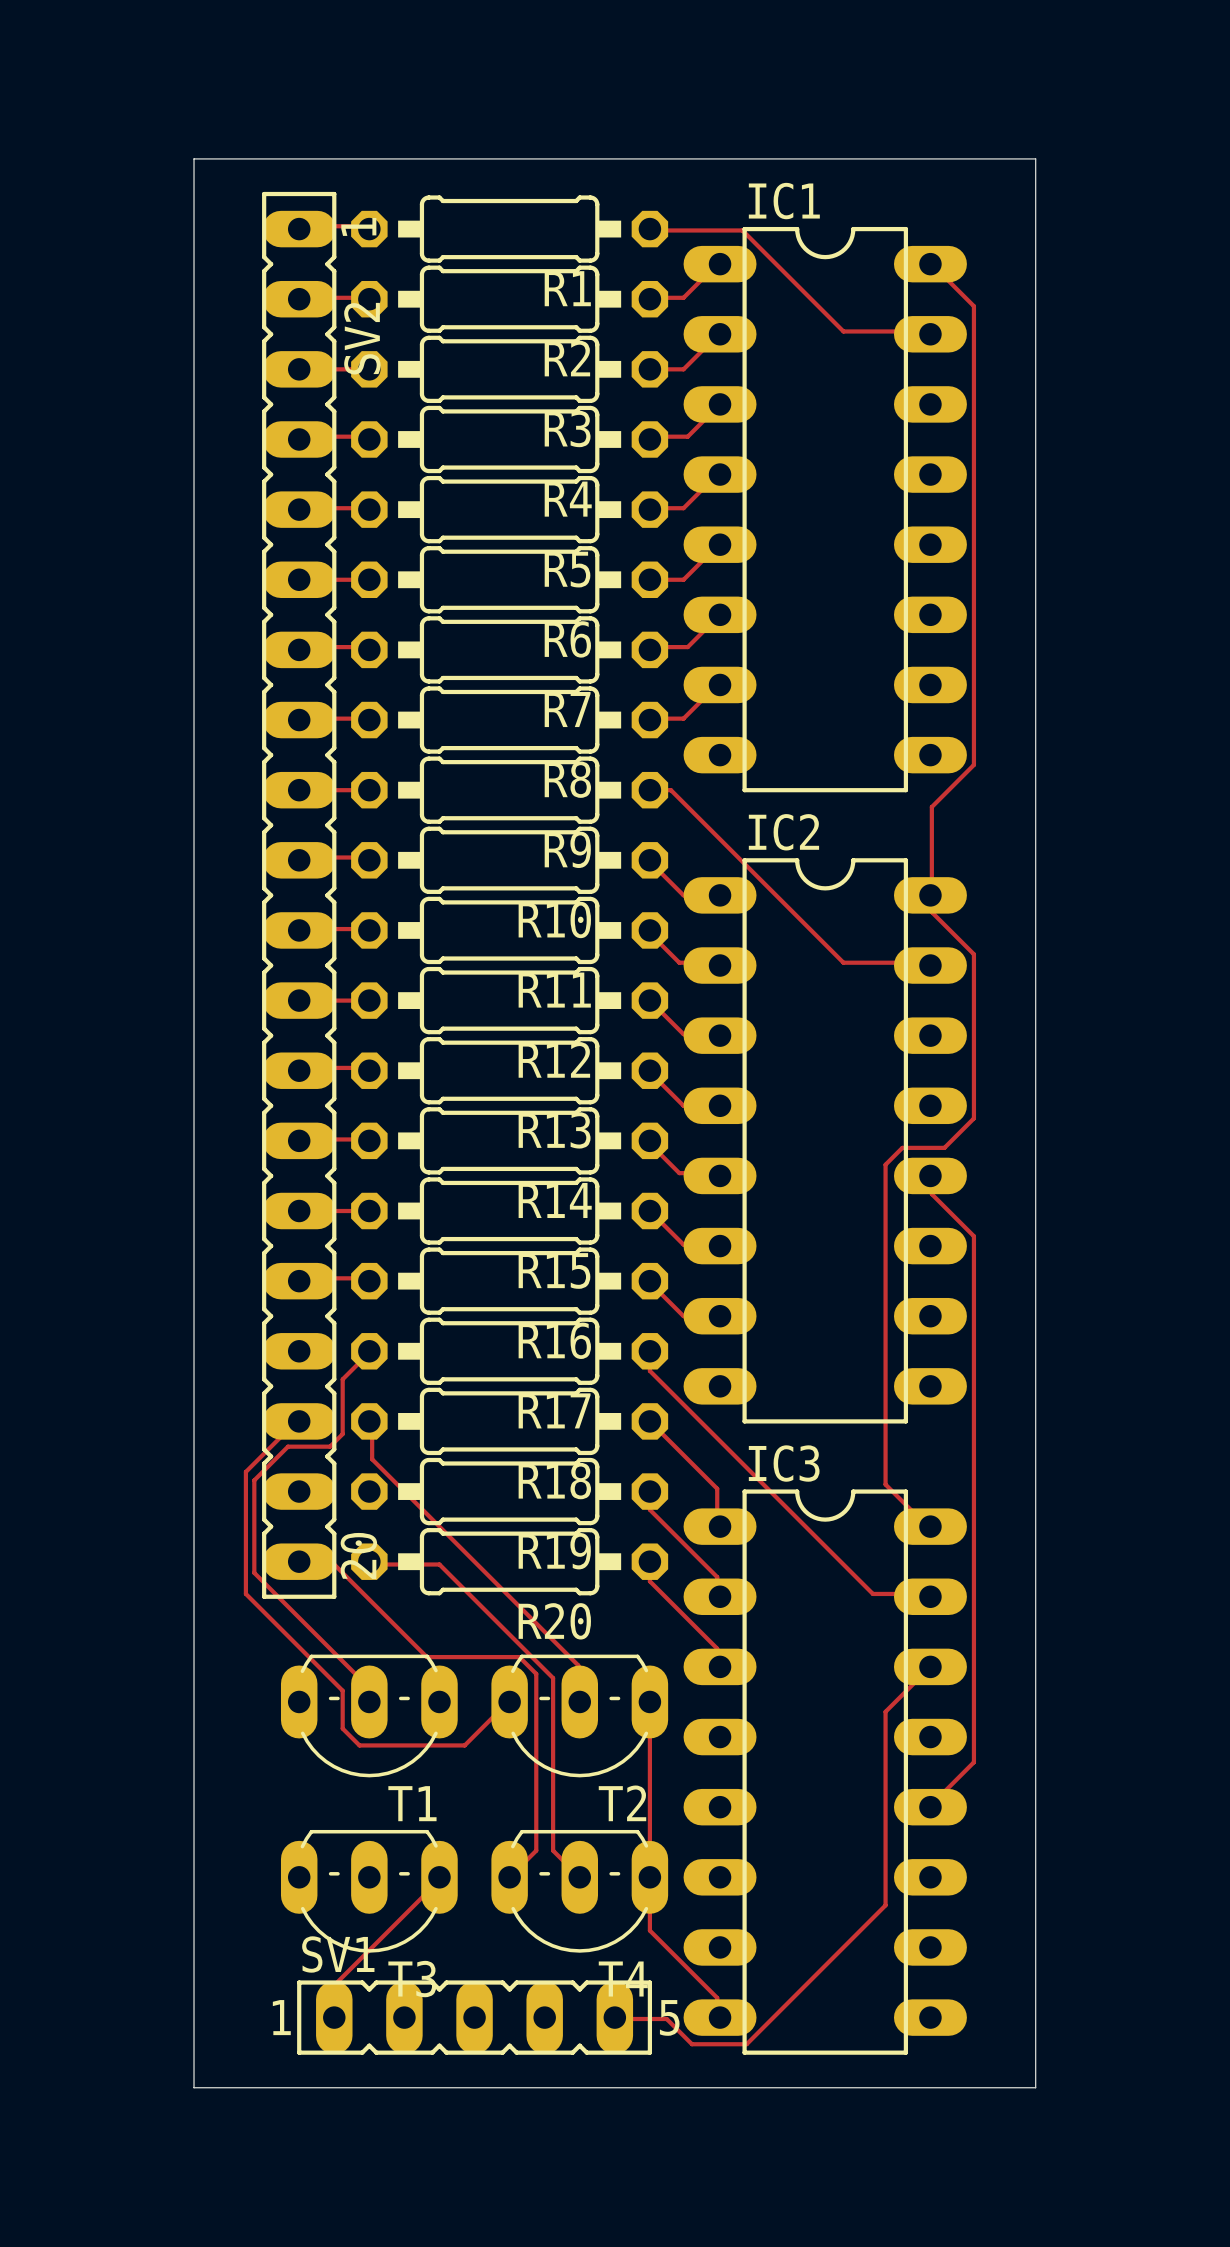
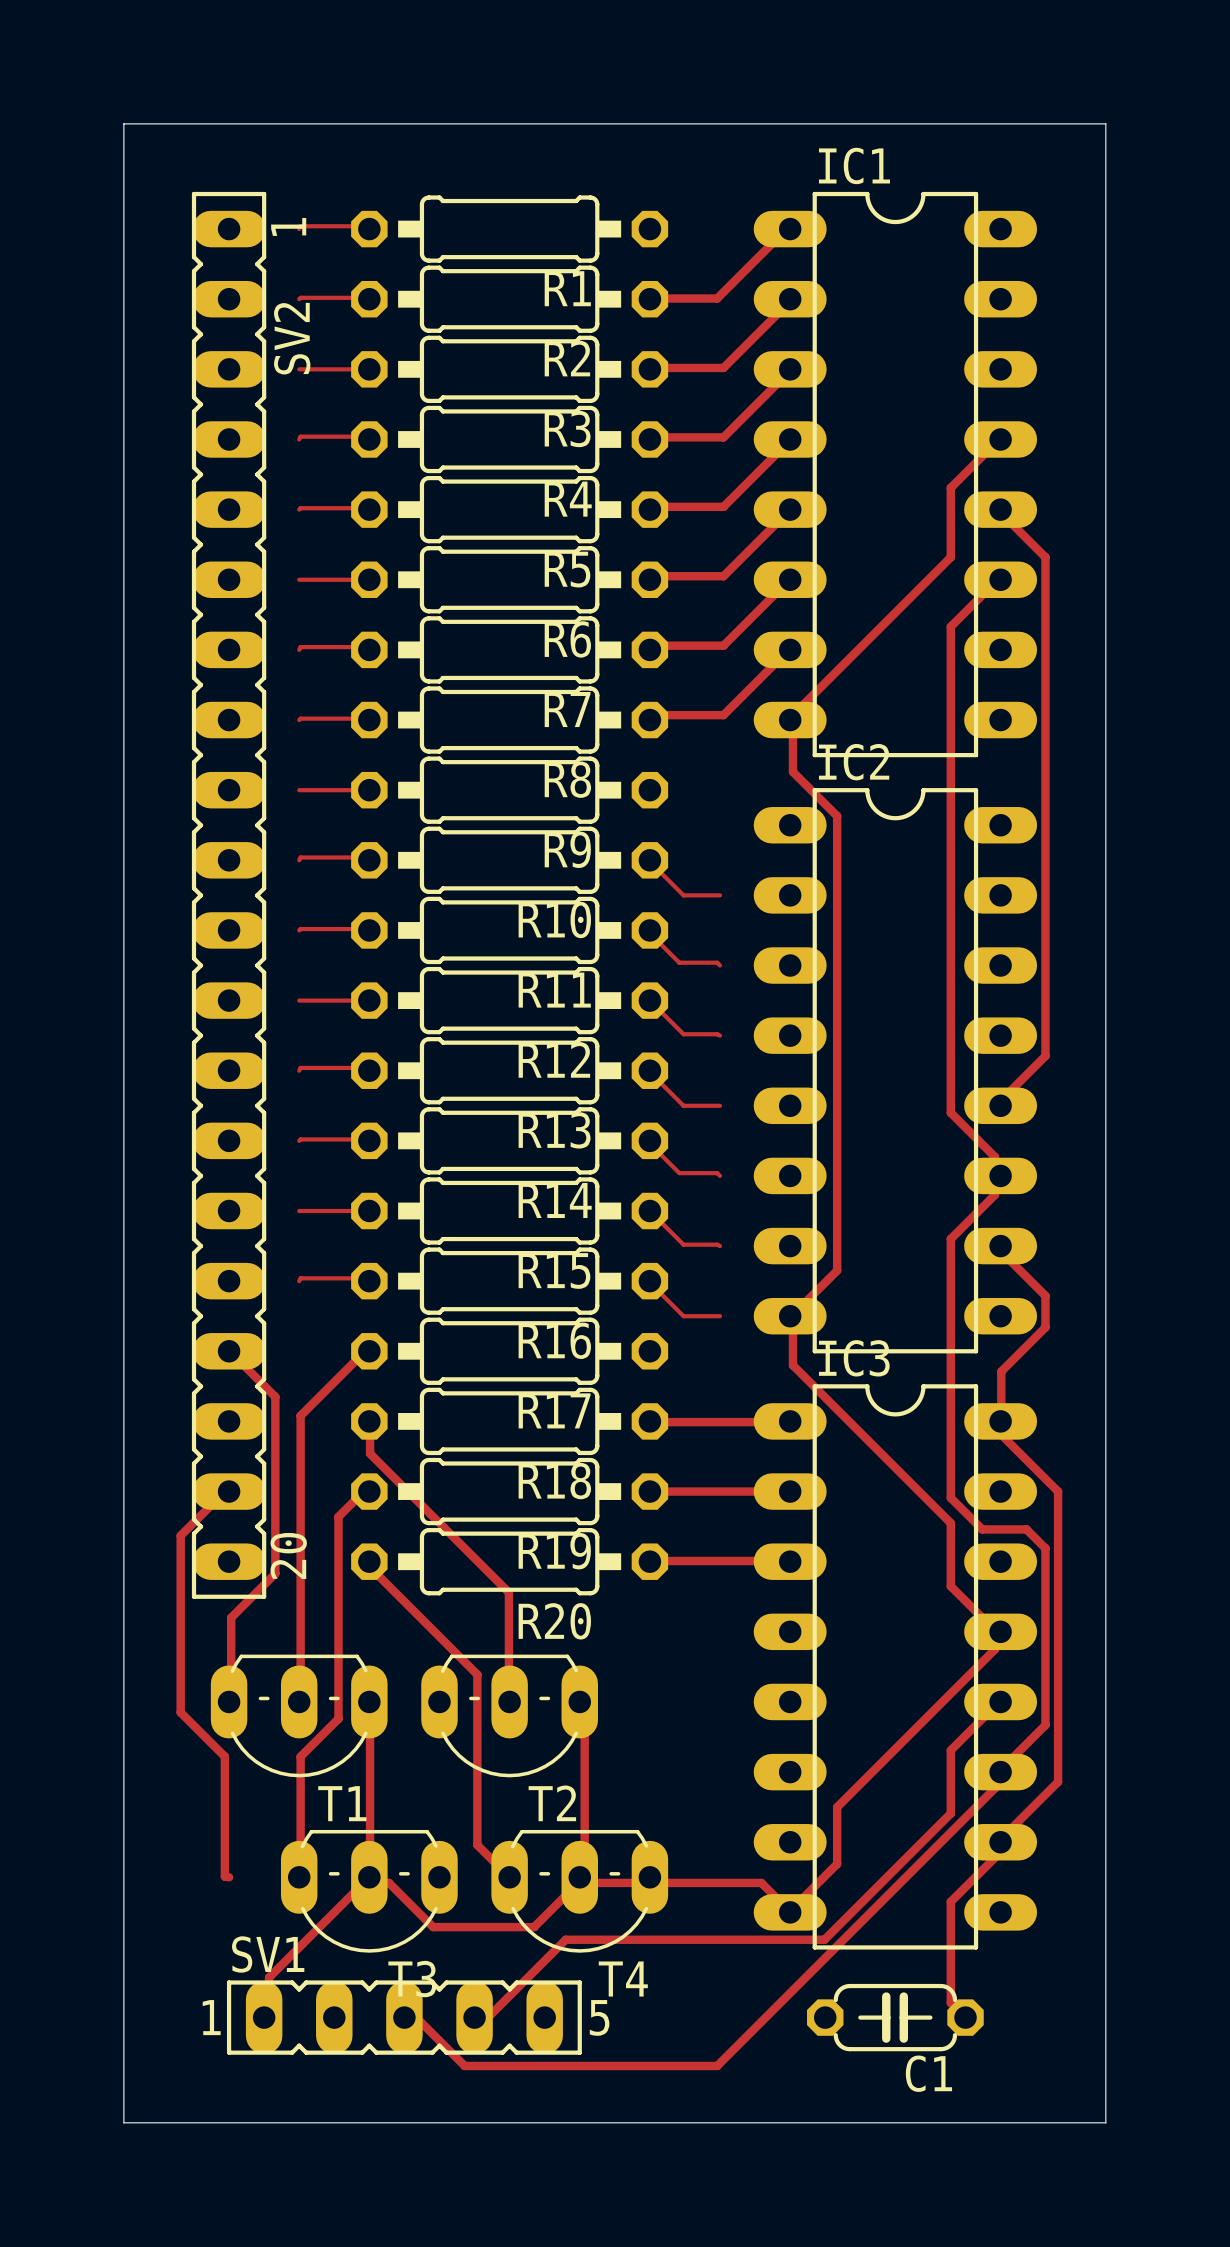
board edge: (194, 158) (1035, 158) (1035, 2087) (194, 2087) (194, 158) -> (123, 123) (123, 2122) (1105, 2122) (1105, 123) (123, 123)
track: (649, 229) (742, 230) (843, 331) (927, 331) (930, 334) -> none
track: (720, 264) (717, 264) (683, 297) (649, 299) -> (790, 229) (786, 229) (717, 298) (649, 299)
track: (930, 264) (973, 306) (973, 764) (931, 807) (931, 912) (973, 954) (973, 1118) (944, 1147) (902, 1147) (885, 1164) (885, 1484) (927, 1526) (930, 1526) -> none
track: (720, 334) (683, 369) (649, 369) -> (790, 299) (723, 367) (649, 369)
track: (720, 404) (687, 436) (649, 436) (649, 439) -> (790, 369) (723, 437) (654, 437) (649, 439)
track: none -> (1000, 439) (950, 487) (950, 557) (790, 720) (792, 721) (792, 771) (837, 816) (837, 1270) (790, 1316) (792, 1321) (792, 1365) (950, 1523) (950, 1586) (994, 1630) (1000, 1631) (994, 1636) (994, 1649) (837, 1807) (837, 1863) (790, 1912) (761, 1882) (584, 1882) (579, 1877)
track: (720, 474) (717, 474) (683, 508) (649, 509) -> (790, 439) (723, 506) (654, 506) (649, 509)
IC1 position: (825, 509) -> (895, 474)
track: none -> (1000, 509) (1001, 513) (1045, 557) (1045, 1056) (1001, 1100) (1000, 1105)
track: (720, 544) (683, 579) (649, 579) -> (790, 509) (723, 576) (654, 576) (649, 579)
track: none -> (1000, 579) (994, 582) (950, 626) (950, 1112) (994, 1157) (994, 1194) (950, 1239) (950, 1497) (982, 1529) (1026, 1529) (1045, 1548) (1045, 1725) (994, 1775) (994, 1788) (717, 2065) (464, 2065) (420, 2021) (407, 2021) (404, 2017)
track: (720, 614) (687, 647) (649, 647) (649, 649) -> (790, 579) (723, 645) (654, 645) (649, 649)
track: (720, 684) (717, 684) (683, 718) (649, 720) -> (790, 649) (723, 715) (654, 715) (649, 720)
track: (649, 790) (670, 790) (843, 962) (927, 962) (930, 965) -> none
SV2 position: (299, 895) -> (229, 895)
IC2 position: (825, 1140) -> (895, 1070)
track: (930, 1175) (931, 1194) (973, 1236) (973, 1762) (930, 1807) -> none
track: none -> (1000, 1246) (1001, 1251) (1045, 1295) (1045, 1327) (1001, 1371) (1000, 1421) (1001, 1434) (1058, 1491) (1058, 1781) (1001, 1838) (1000, 1842) (994, 1845) (994, 1857) (950, 1901) (950, 2002) (965, 2017)
track: none -> (229, 1351) (275, 1396) (275, 1573) (231, 1617) (231, 1699) (229, 1701)
track: (369, 1351) (342, 1379) (342, 1434) (330, 1446) (287, 1446) (254, 1480) (254, 1572) (367, 1686) (369, 1701) -> (369, 1351) (363, 1352) (300, 1415) (299, 1701)
track: (649, 1351) (649, 1370) (872, 1593) (927, 1593) (930, 1596) -> none
track: (299, 1421) (296, 1421) (245, 1471) (245, 1593) (342, 1690) (342, 1728) (359, 1745) (464, 1745) (509, 1701) -> none
track: (369, 1421) (372, 1421) (372, 1459) (578, 1665) (579, 1701) -> (369, 1421) (370, 1453) (508, 1592) (509, 1701)
track: (649, 1421) (717, 1488) (717, 1526) (720, 1526) -> (649, 1421) (790, 1421)
track: none -> (229, 1491) (224, 1491) (180, 1535) (180, 1712) (224, 1756) (224, 1876) (229, 1877)
track: none -> (369, 1491) (363, 1491) (338, 1516) (338, 1718) (300, 1756) (299, 1877)
track: (649, 1491) (649, 1509) (717, 1577) (717, 1593) (720, 1596) -> (649, 1491) (790, 1491)
track: (299, 1561) (300, 1564) (334, 1564) (426, 1657) (519, 1657) (536, 1673) (536, 1850) (509, 1877) -> none
track: (369, 1561) (372, 1564) (439, 1564) (553, 1678) (553, 1850) (579, 1877) -> (369, 1561) (370, 1567) (477, 1674) (477, 1845) (509, 1877)
track: (649, 1561) (649, 1581) (717, 1648) (717, 1665) (720, 1666) -> (649, 1561) (790, 1561)
track: (930, 1666) (885, 1711) (885, 1905) (746, 2044) (691, 2044) (666, 2018) (614, 2017) -> none
track: none -> (369, 1701) (370, 1876) (269, 1977) (269, 2015) (264, 2017)
track: none -> (579, 1701) (584, 1706) (584, 1876) (579, 1877)
track: (649, 1701) (649, 1930) (717, 1997) (717, 2014) (720, 2017) -> none
track: none -> (1000, 1701) (950, 1750) (950, 1813) (824, 1939) (565, 1939) (489, 2015) (477, 2015) (474, 2017)
T1 position: (369, 1715) -> (299, 1715)
T2 position: (579, 1715) -> (509, 1715)
IC3 position: (825, 1772) -> (895, 1666)
track: none -> (369, 1877) (370, 1882) (388, 1882) (433, 1927) (534, 1927) (578, 1882) (579, 1877)
track: (439, 1877) (439, 1880) (334, 1985) (334, 2017) -> none
SV1 position: (474, 2017) -> (404, 2017)
C1: none -> (895, 2017)

